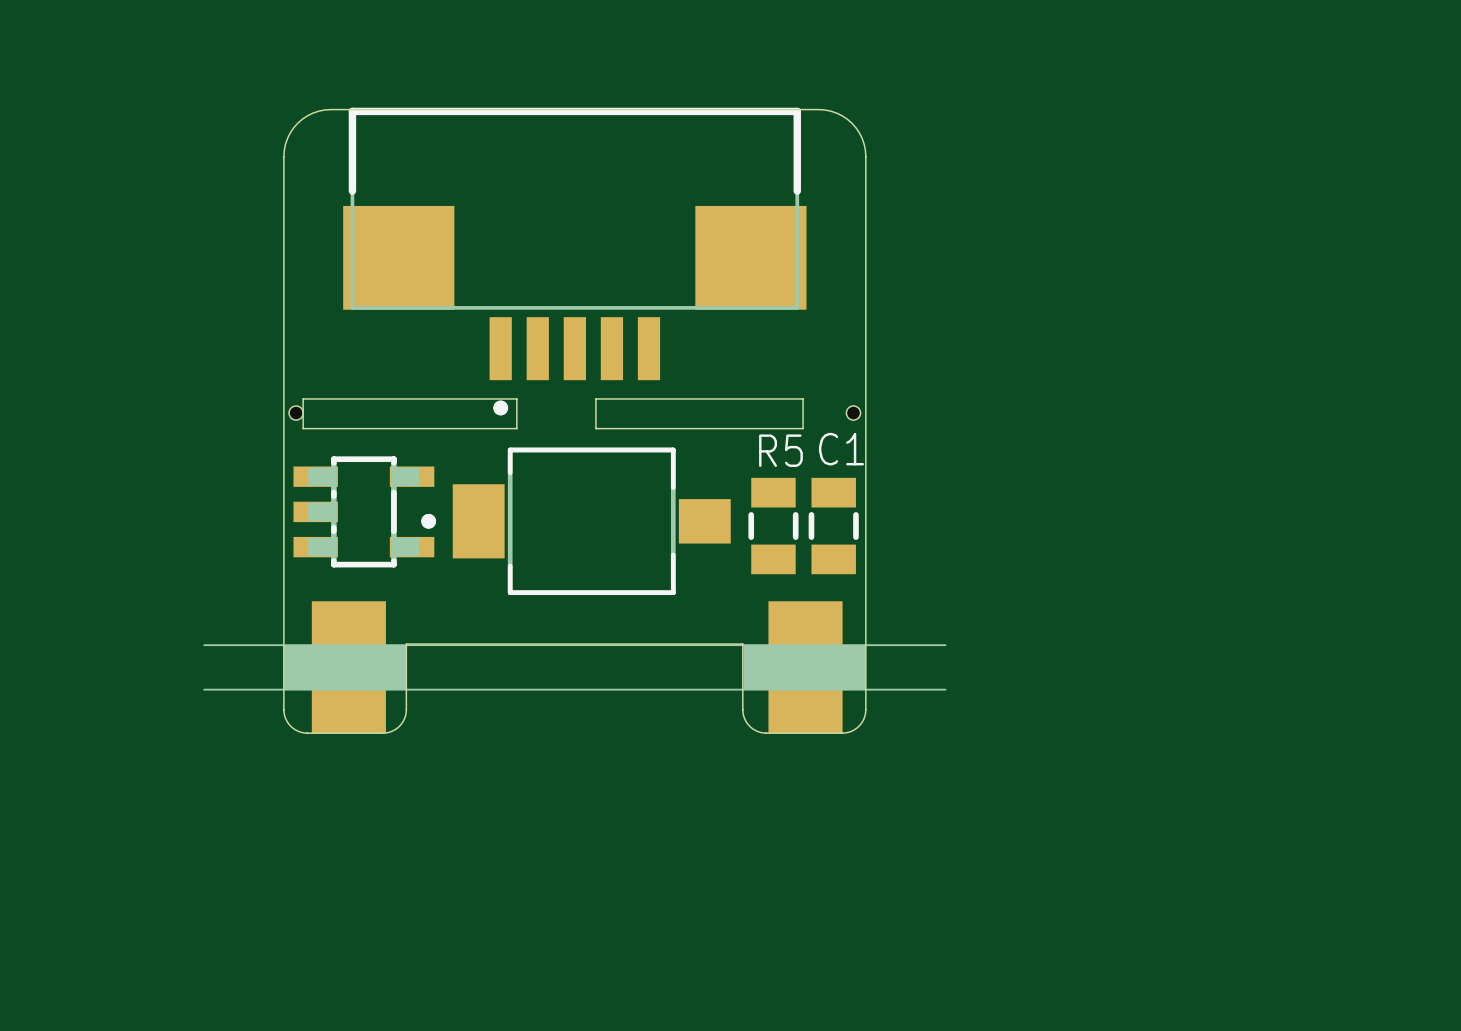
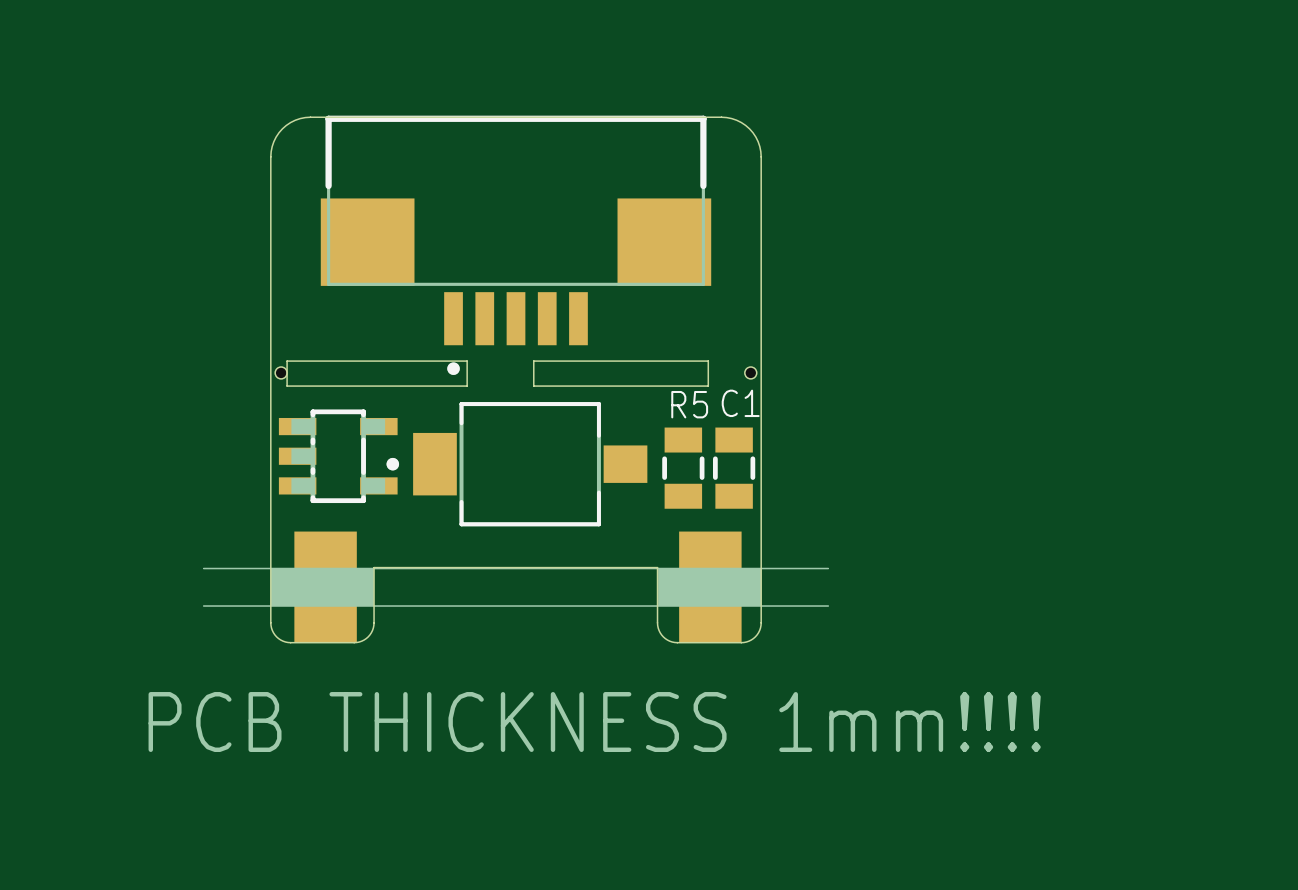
text: none -> PCB THICKNESS 1mm!!!! (594, 722)

